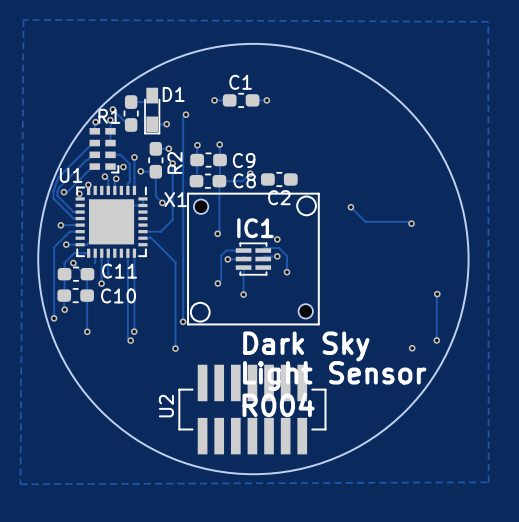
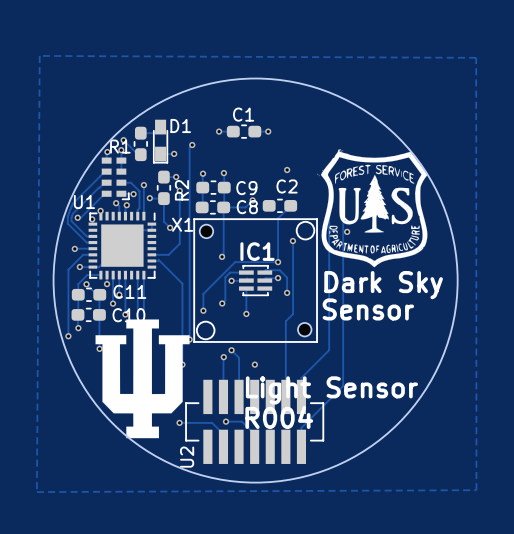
drawing: none -> [317, 149, 428, 268]
via: none -> (287, 170)
track: none -> (290, 205) (278, 218) (278, 262) (235, 262) (203, 293) (203, 310)
track: none -> (329, 206) (329, 350) (301, 377) (301, 396)
track: none -> (343, 219) (343, 386) (301, 427) (301, 446)
C2 name position: C2 (279, 197) -> C2 (287, 186)
track: (350, 207) (365, 221) (409, 221) (411, 223) -> none
via: none -> (292, 241)
track: none -> (293, 241) (293, 314) (285, 321) (285, 396)
via: (411, 223) -> none
track: none -> (125, 275) (125, 314)
via: none -> (107, 284)
via: none -> (119, 294)
text: none -> Sensor (368, 309)
via: none -> (203, 310)
track: (437, 294) (436, 340) -> none
via: (437, 294) -> none
via: none -> (125, 314)
drawing: none -> [95, 319, 190, 439]
track: none -> (231, 350) (239, 357) (239, 396)
via: none -> (231, 350)
track: none -> (223, 357) (223, 396)
via: none -> (223, 357)
via: (436, 340) -> none
text position: Dark Sky (306, 346) -> Dark Sky (383, 285)
via: none -> (254, 364)
via: (412, 348) -> none
U2 name position: U2 (166, 406) -> U2 (187, 457)
track: none -> (226, 421) (242, 421) (254, 434)
via: none -> (226, 421)
track: none -> (179, 422) (212, 422) (223, 434) (223, 446)
via: none -> (179, 422)

